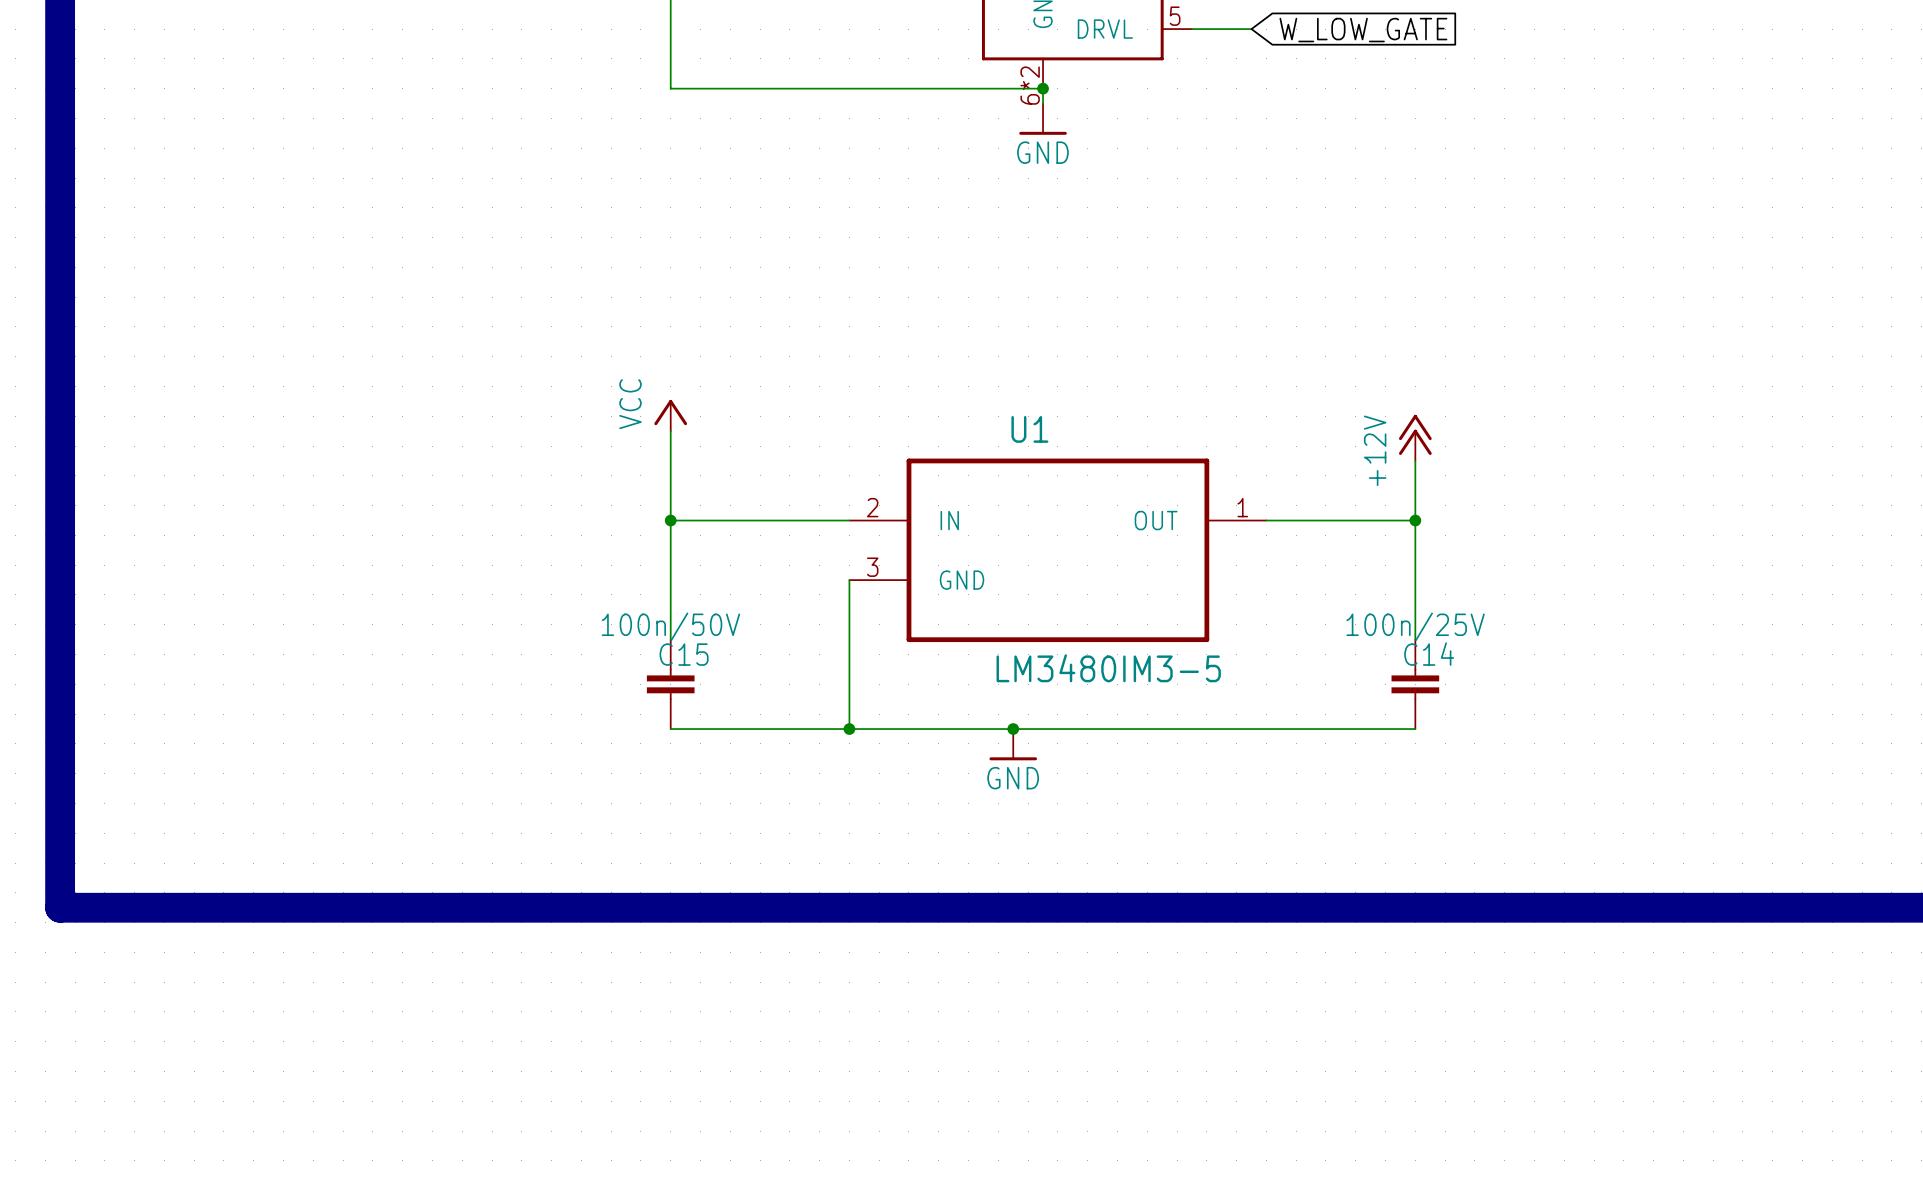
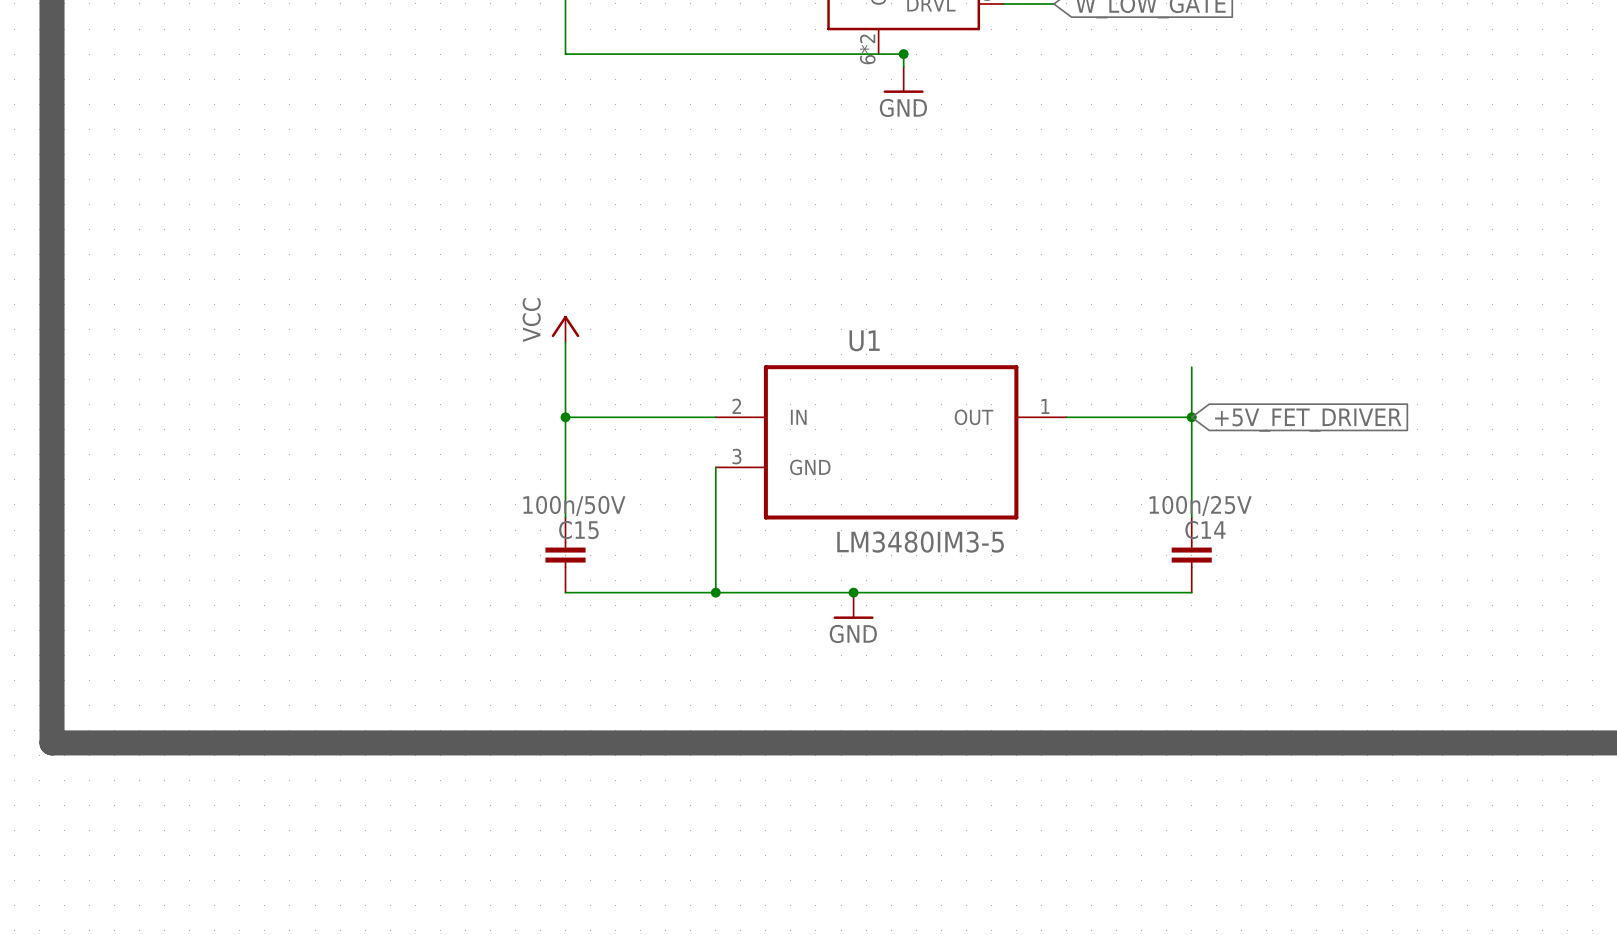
wire: (1043, 88) (1043, 103) -> (878, 54) (903, 54) (903, 66)
junction position: (1043, 88) -> (903, 54)
power symbol position: GND (1043, 119) -> GND (903, 79)
power symbol: +12V (1415, 437) -> none
global label: none -> +5V_FET_DRIVER (1308, 420)

